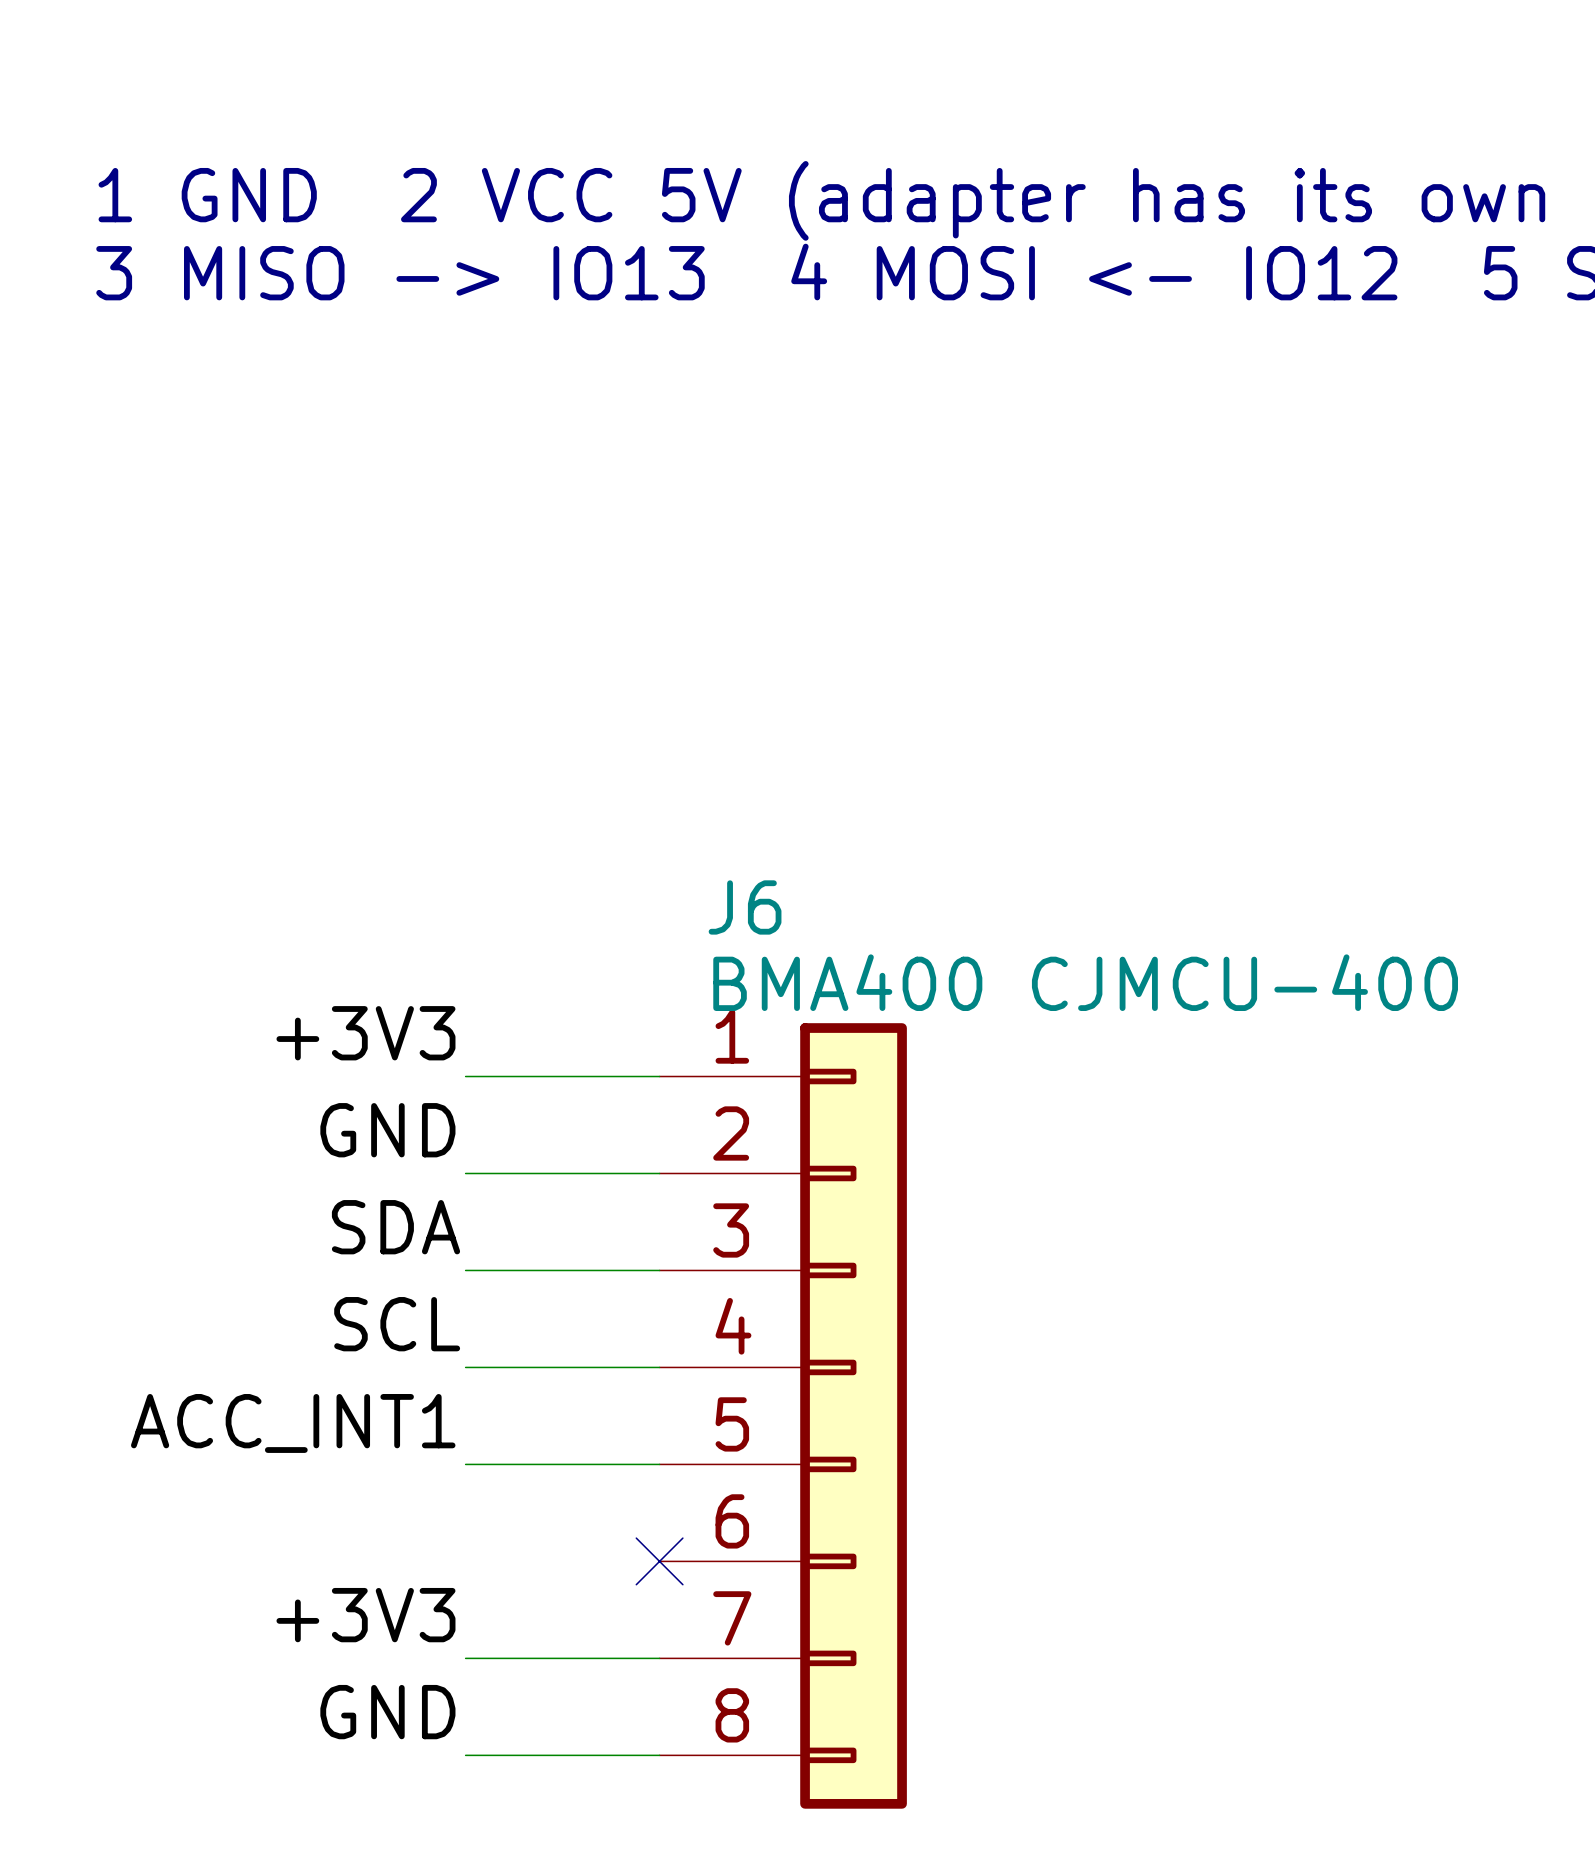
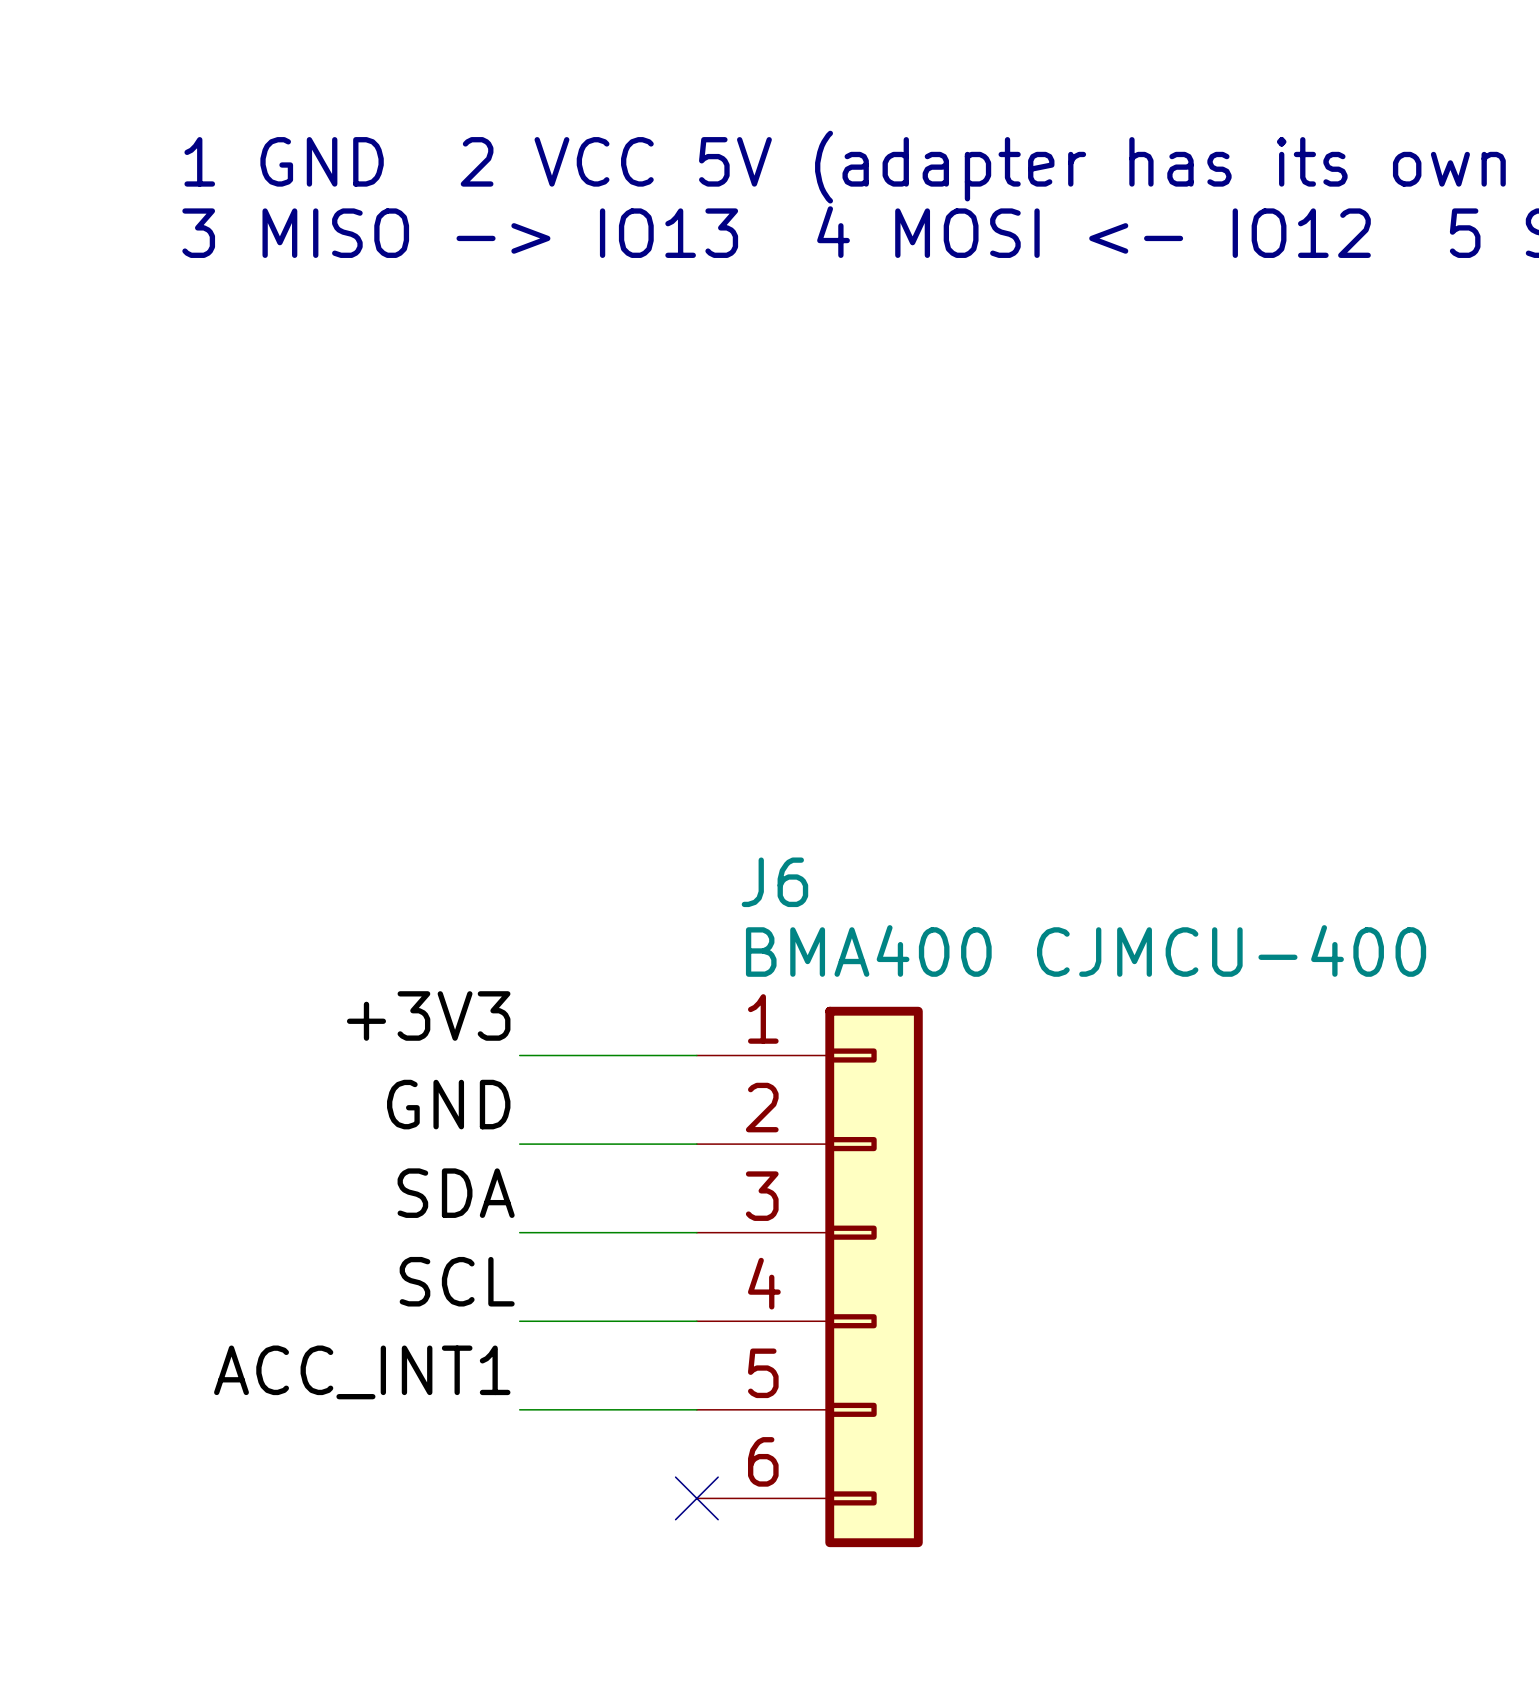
J6 name position: J6 (745, 907) -> J6 (774, 882)
J6 value position: BMA400 CJMCU-400 (1085, 982) -> BMA400 CJMCU-400 (1086, 950)
J6 symbol: [659, 1023, 907, 1809] -> [696, 1006, 923, 1548]
label: +3V3 (365, 1033) -> none
wire: (465, 1076) (659, 1076) -> none
label: GND (387, 1130) -> +3V3 (428, 1015)
label: SDA (395, 1227) -> GND (448, 1104)
label: SCL (397, 1324) -> SDA (456, 1193)
label: ACC_INT1 (293, 1423) -> SCL (457, 1281)
label: none -> ACC_INT1 (362, 1372)
no-connect mark position: (659, 1561) -> (696, 1498)
label: +3V3 (365, 1615) -> none
wire: (465, 1658) (659, 1658) -> (519, 1409) (696, 1409)
label: GND (387, 1712) -> none
wire: (465, 1755) (659, 1755) -> none

